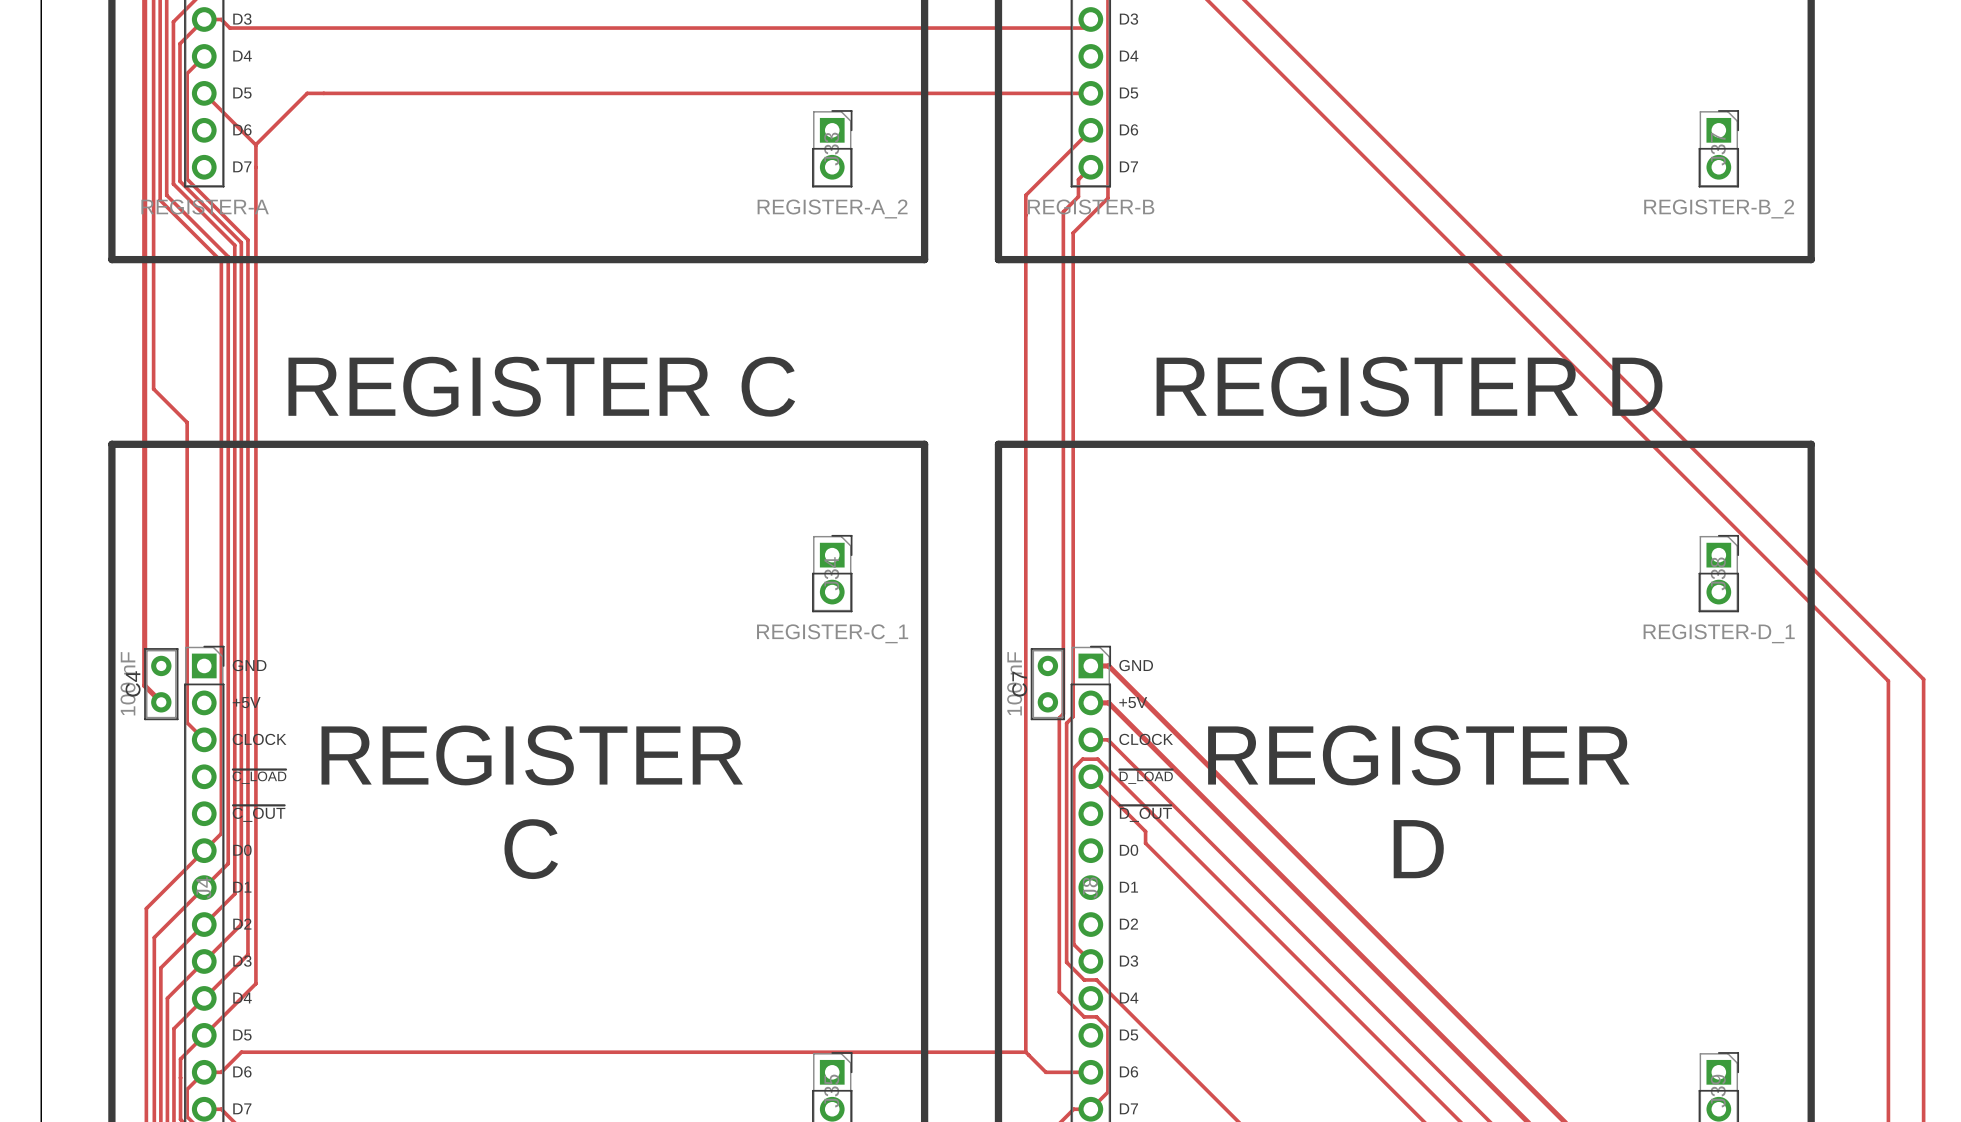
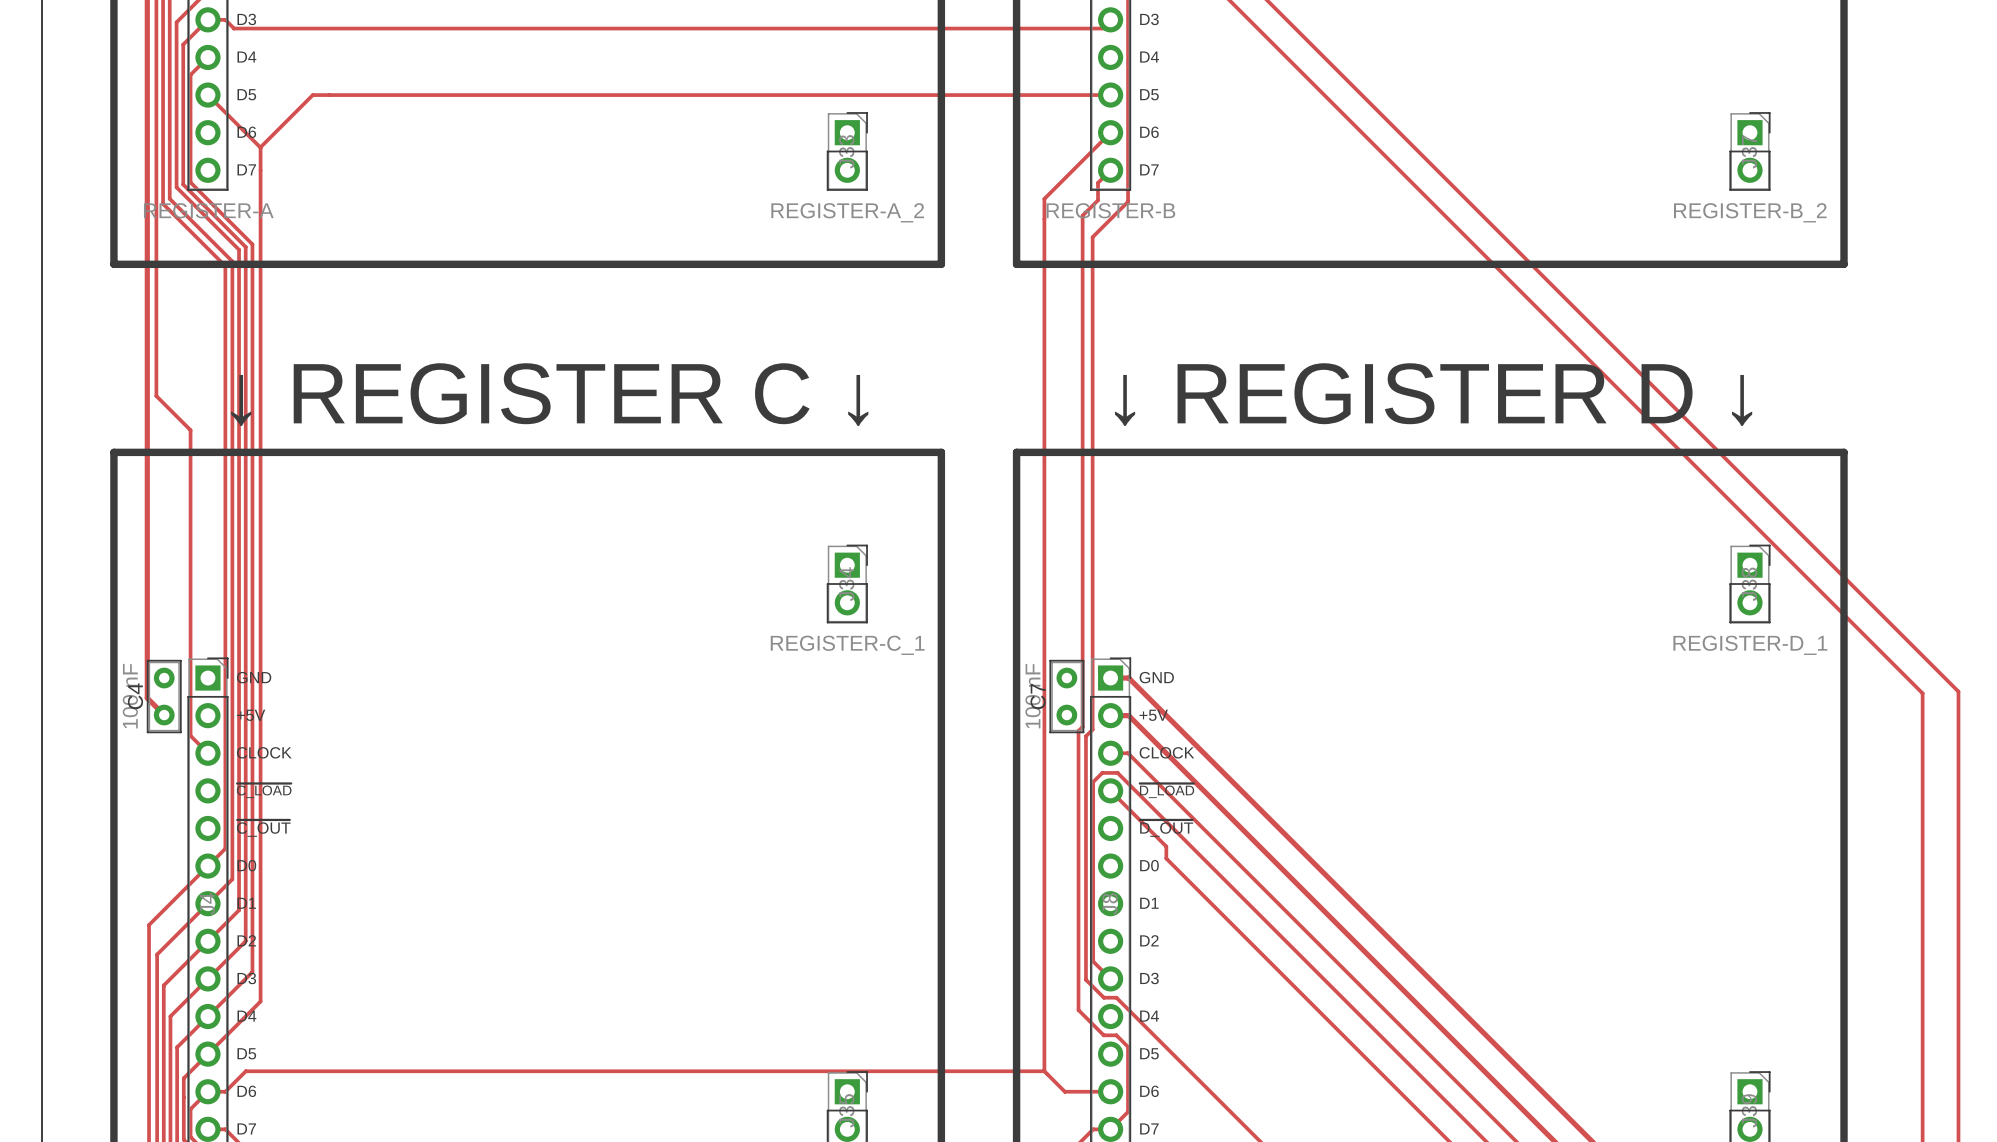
text: REGISTER C (541, 386) -> ↓ REGISTER C ↓ (549, 394)
text: REGISTER D (1409, 386) -> ↓ REGISTER D ↓ (1433, 394)
text: REGISTER (532, 755) -> none
text: REGISTER (1418, 755) -> none
text: C (531, 849) -> none
text: D (1418, 849) -> none

